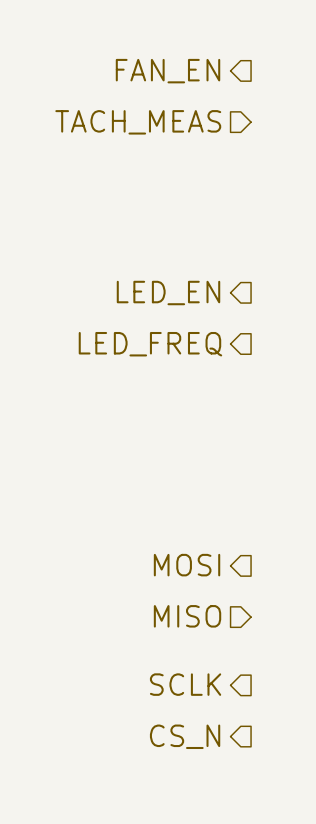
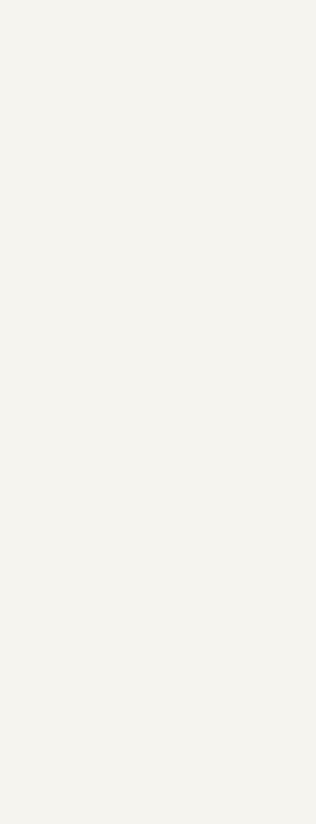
hierarchical label: FAN_EN (168, 71) -> none
hierarchical label: TACH_MEAS (138, 122) -> none
hierarchical label: LED_EN (168, 293) -> none
hierarchical label: LED_FREQ (150, 344) -> none
hierarchical label: MOSI (187, 565) -> none
hierarchical label: MISO (187, 616) -> none
hierarchical label: SCLK (185, 684) -> none
hierarchical label: CS_N (185, 736) -> none

